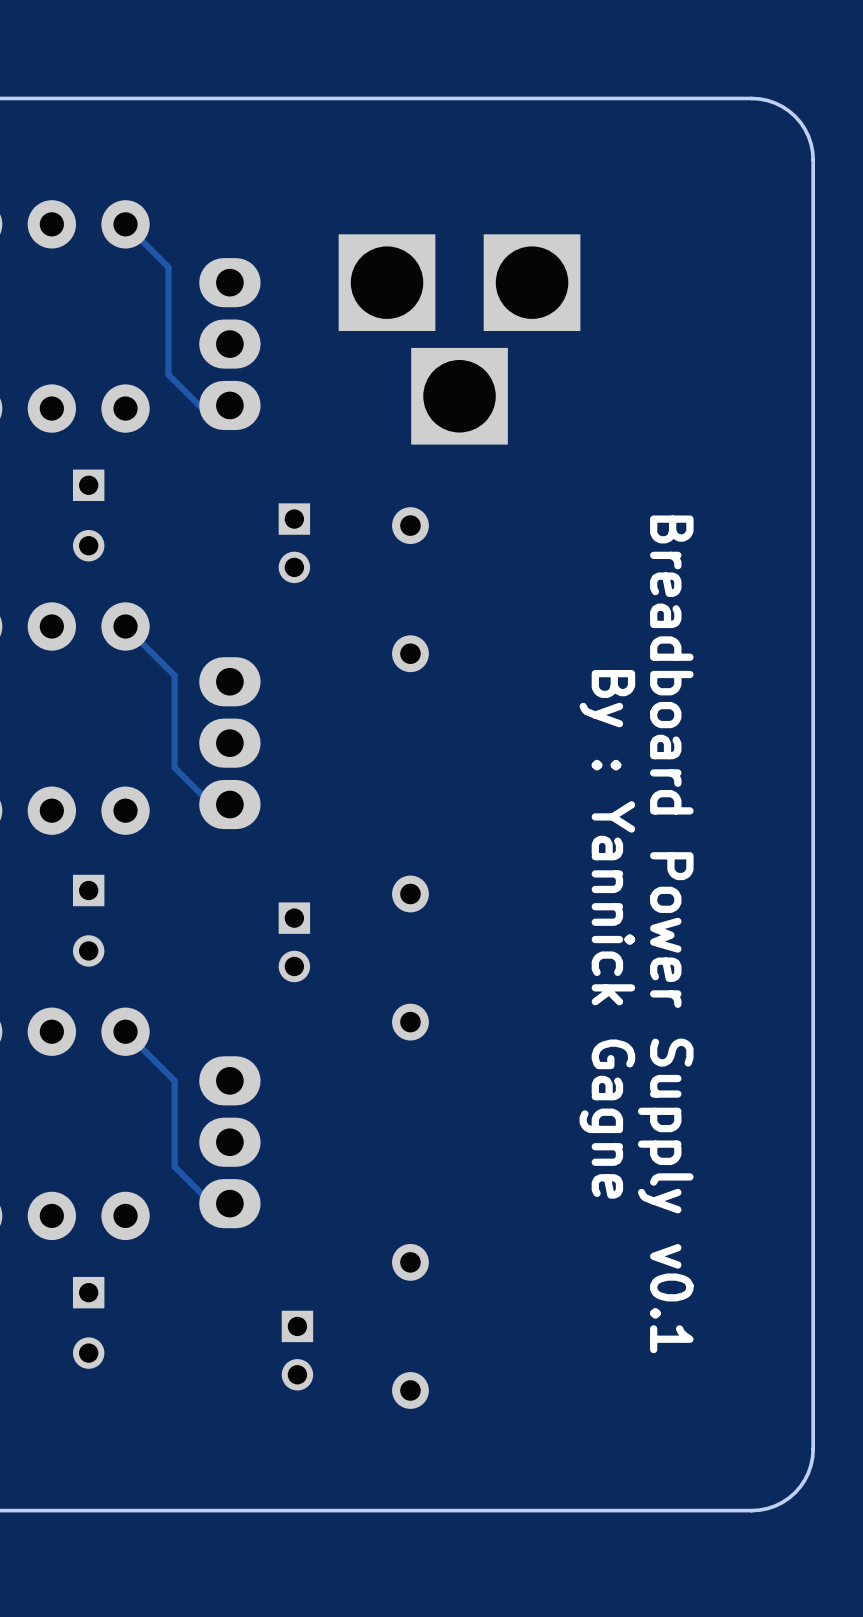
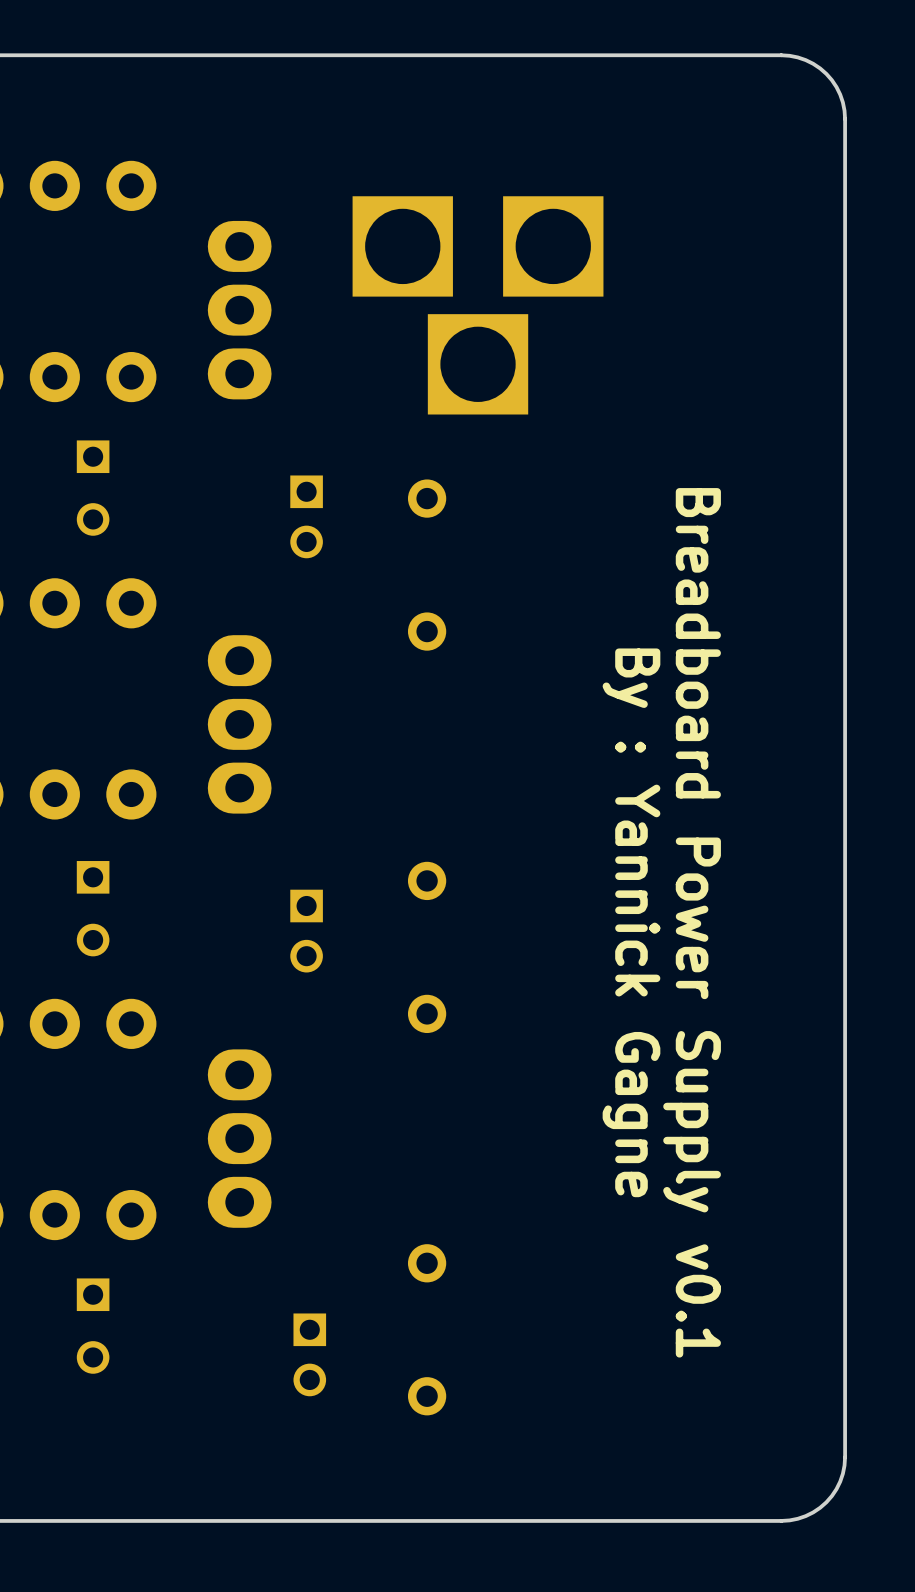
track: (125, 224) (168, 267) (168, 374) (199, 405) (229, 405) -> none
track: (125, 626) (174, 675) (174, 767) (211, 804) (229, 804) -> none
track: (125, 1031) (174, 1080) (174, 1166) (211, 1203) (229, 1203) -> none

